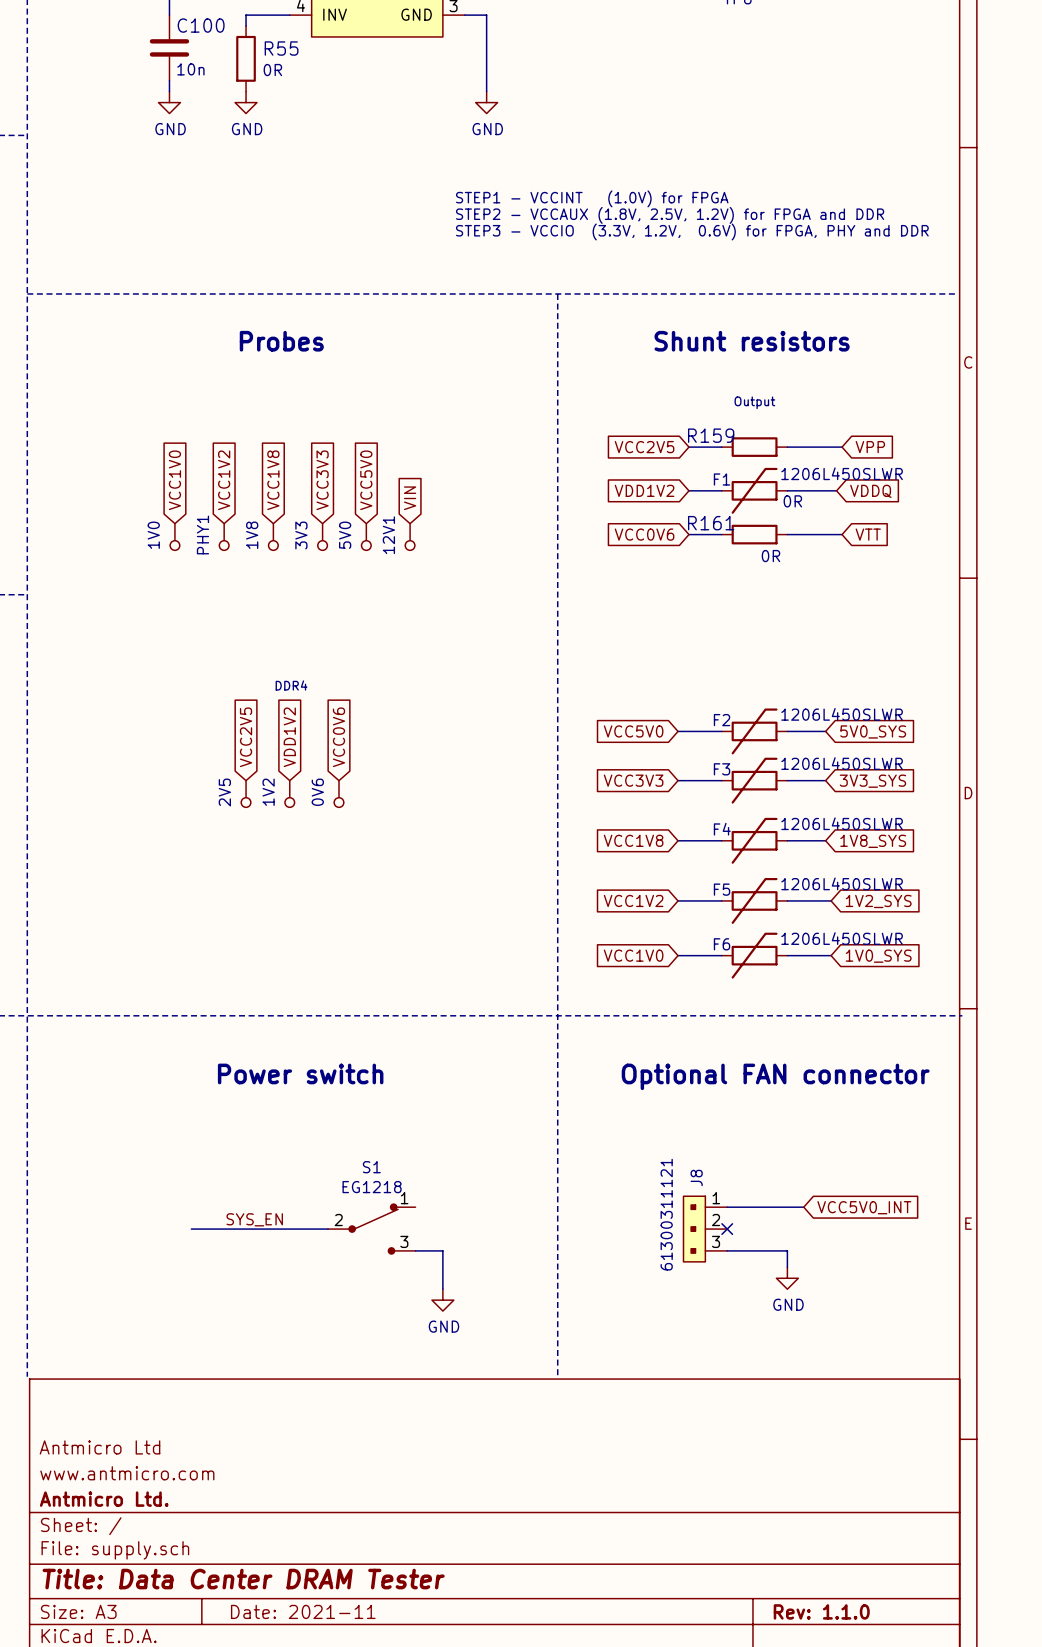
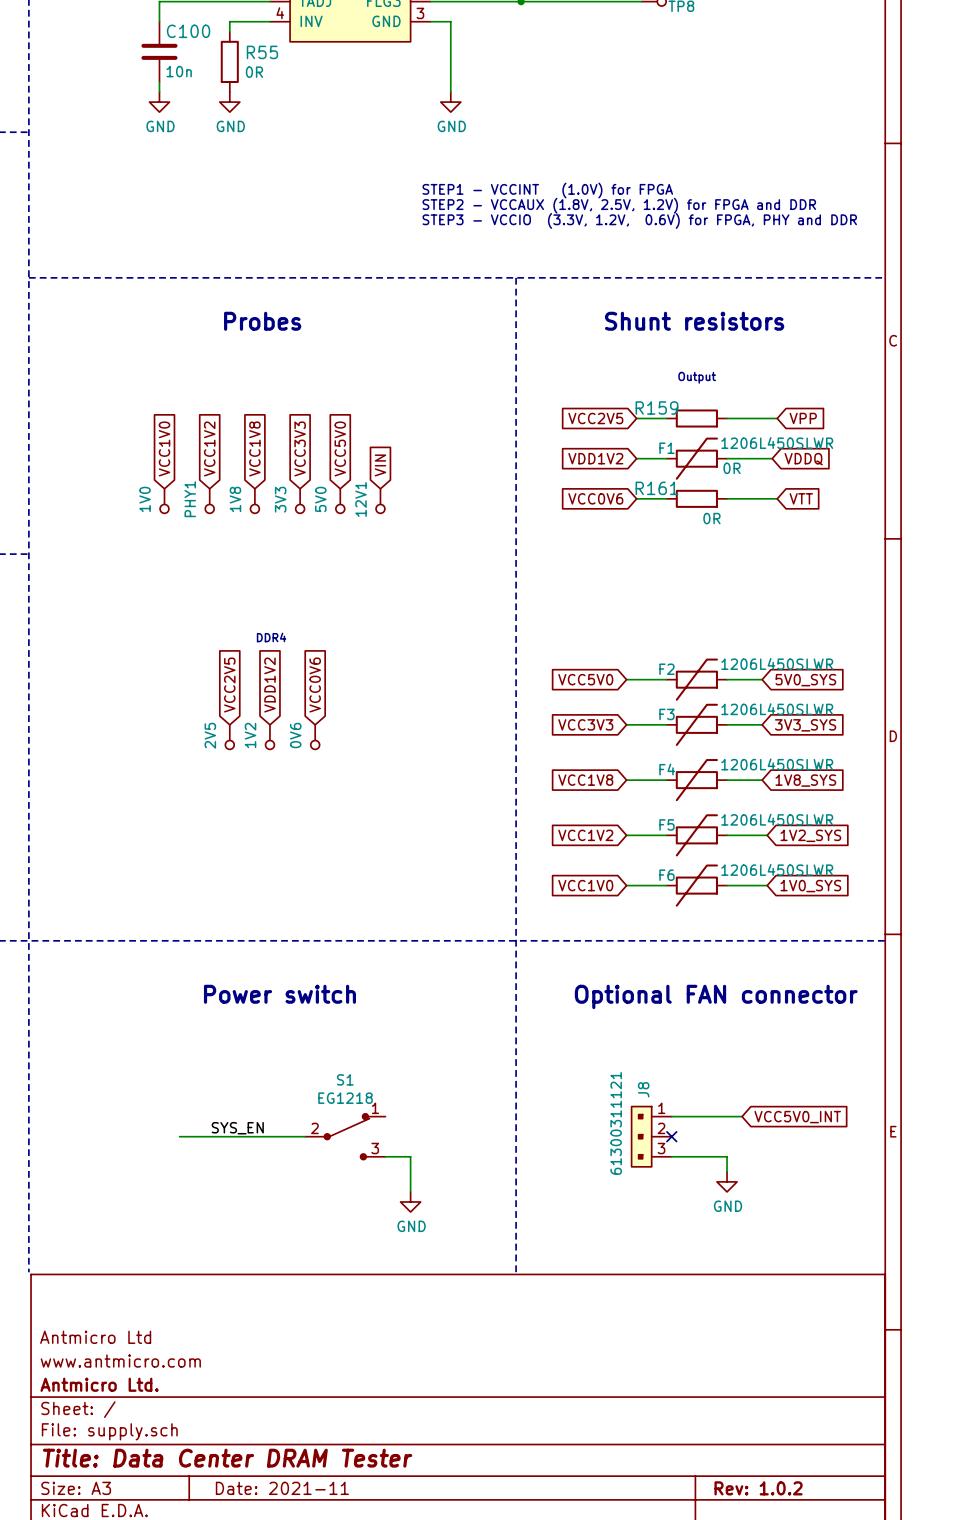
title block: Rev: 1.1.0 (821, 1611) -> Rev: 1.0.2 (758, 1488)

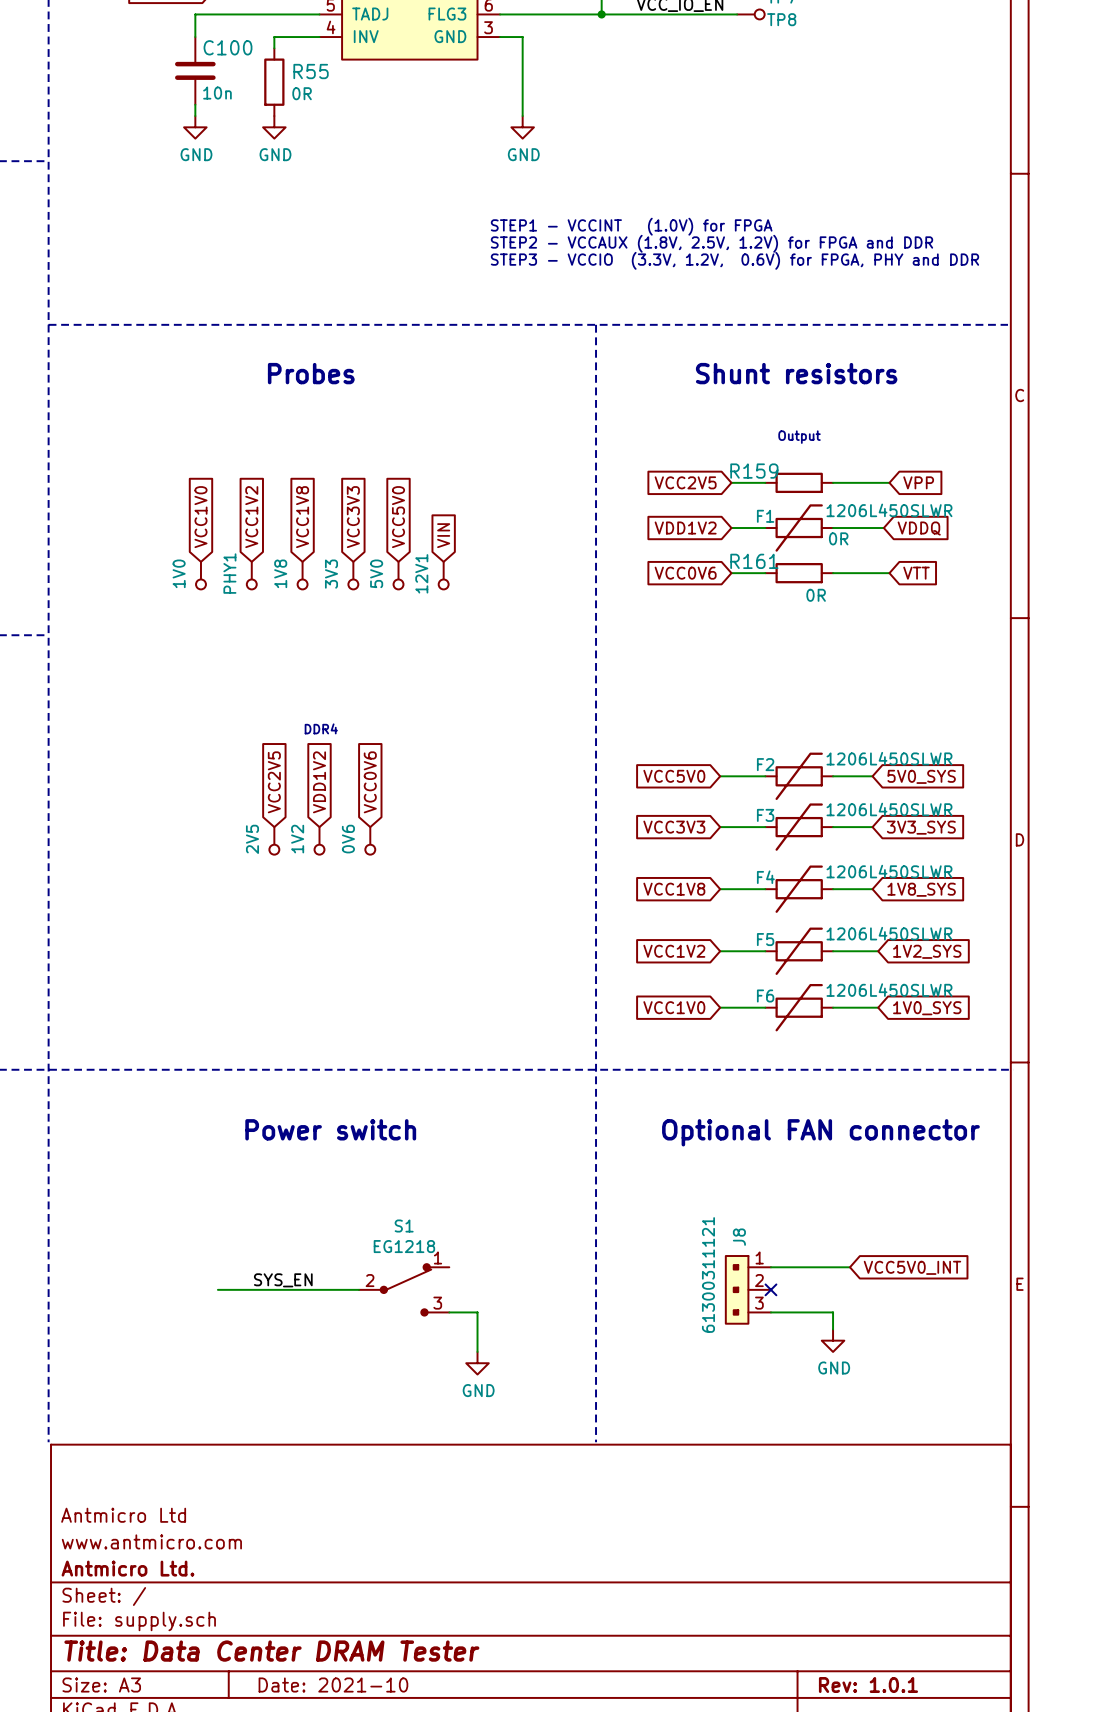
title block: Date: 2021-11 (282, 1488) -> Date: 2021-10 (333, 1685)
title block: Rev: 1.0.2 (758, 1488) -> Rev: 1.0.1 (868, 1685)

